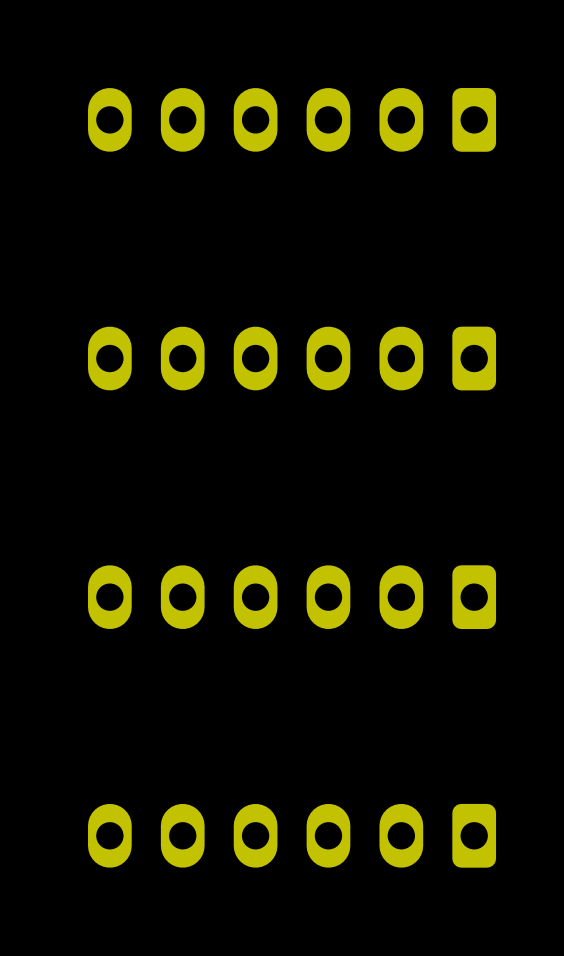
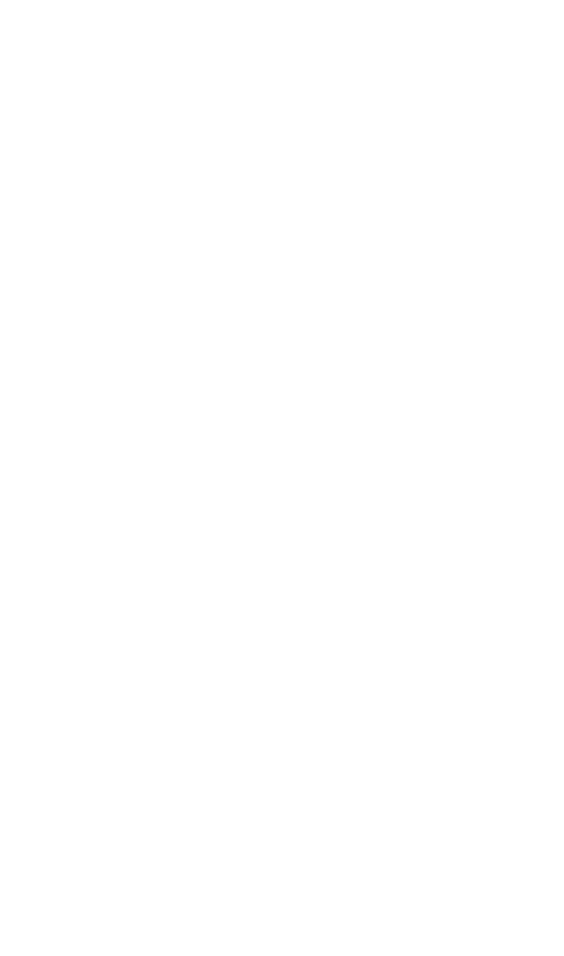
part: (292, 119) -> none
part: (292, 358) -> none
part: (292, 597) -> none
part: (292, 835) -> none

